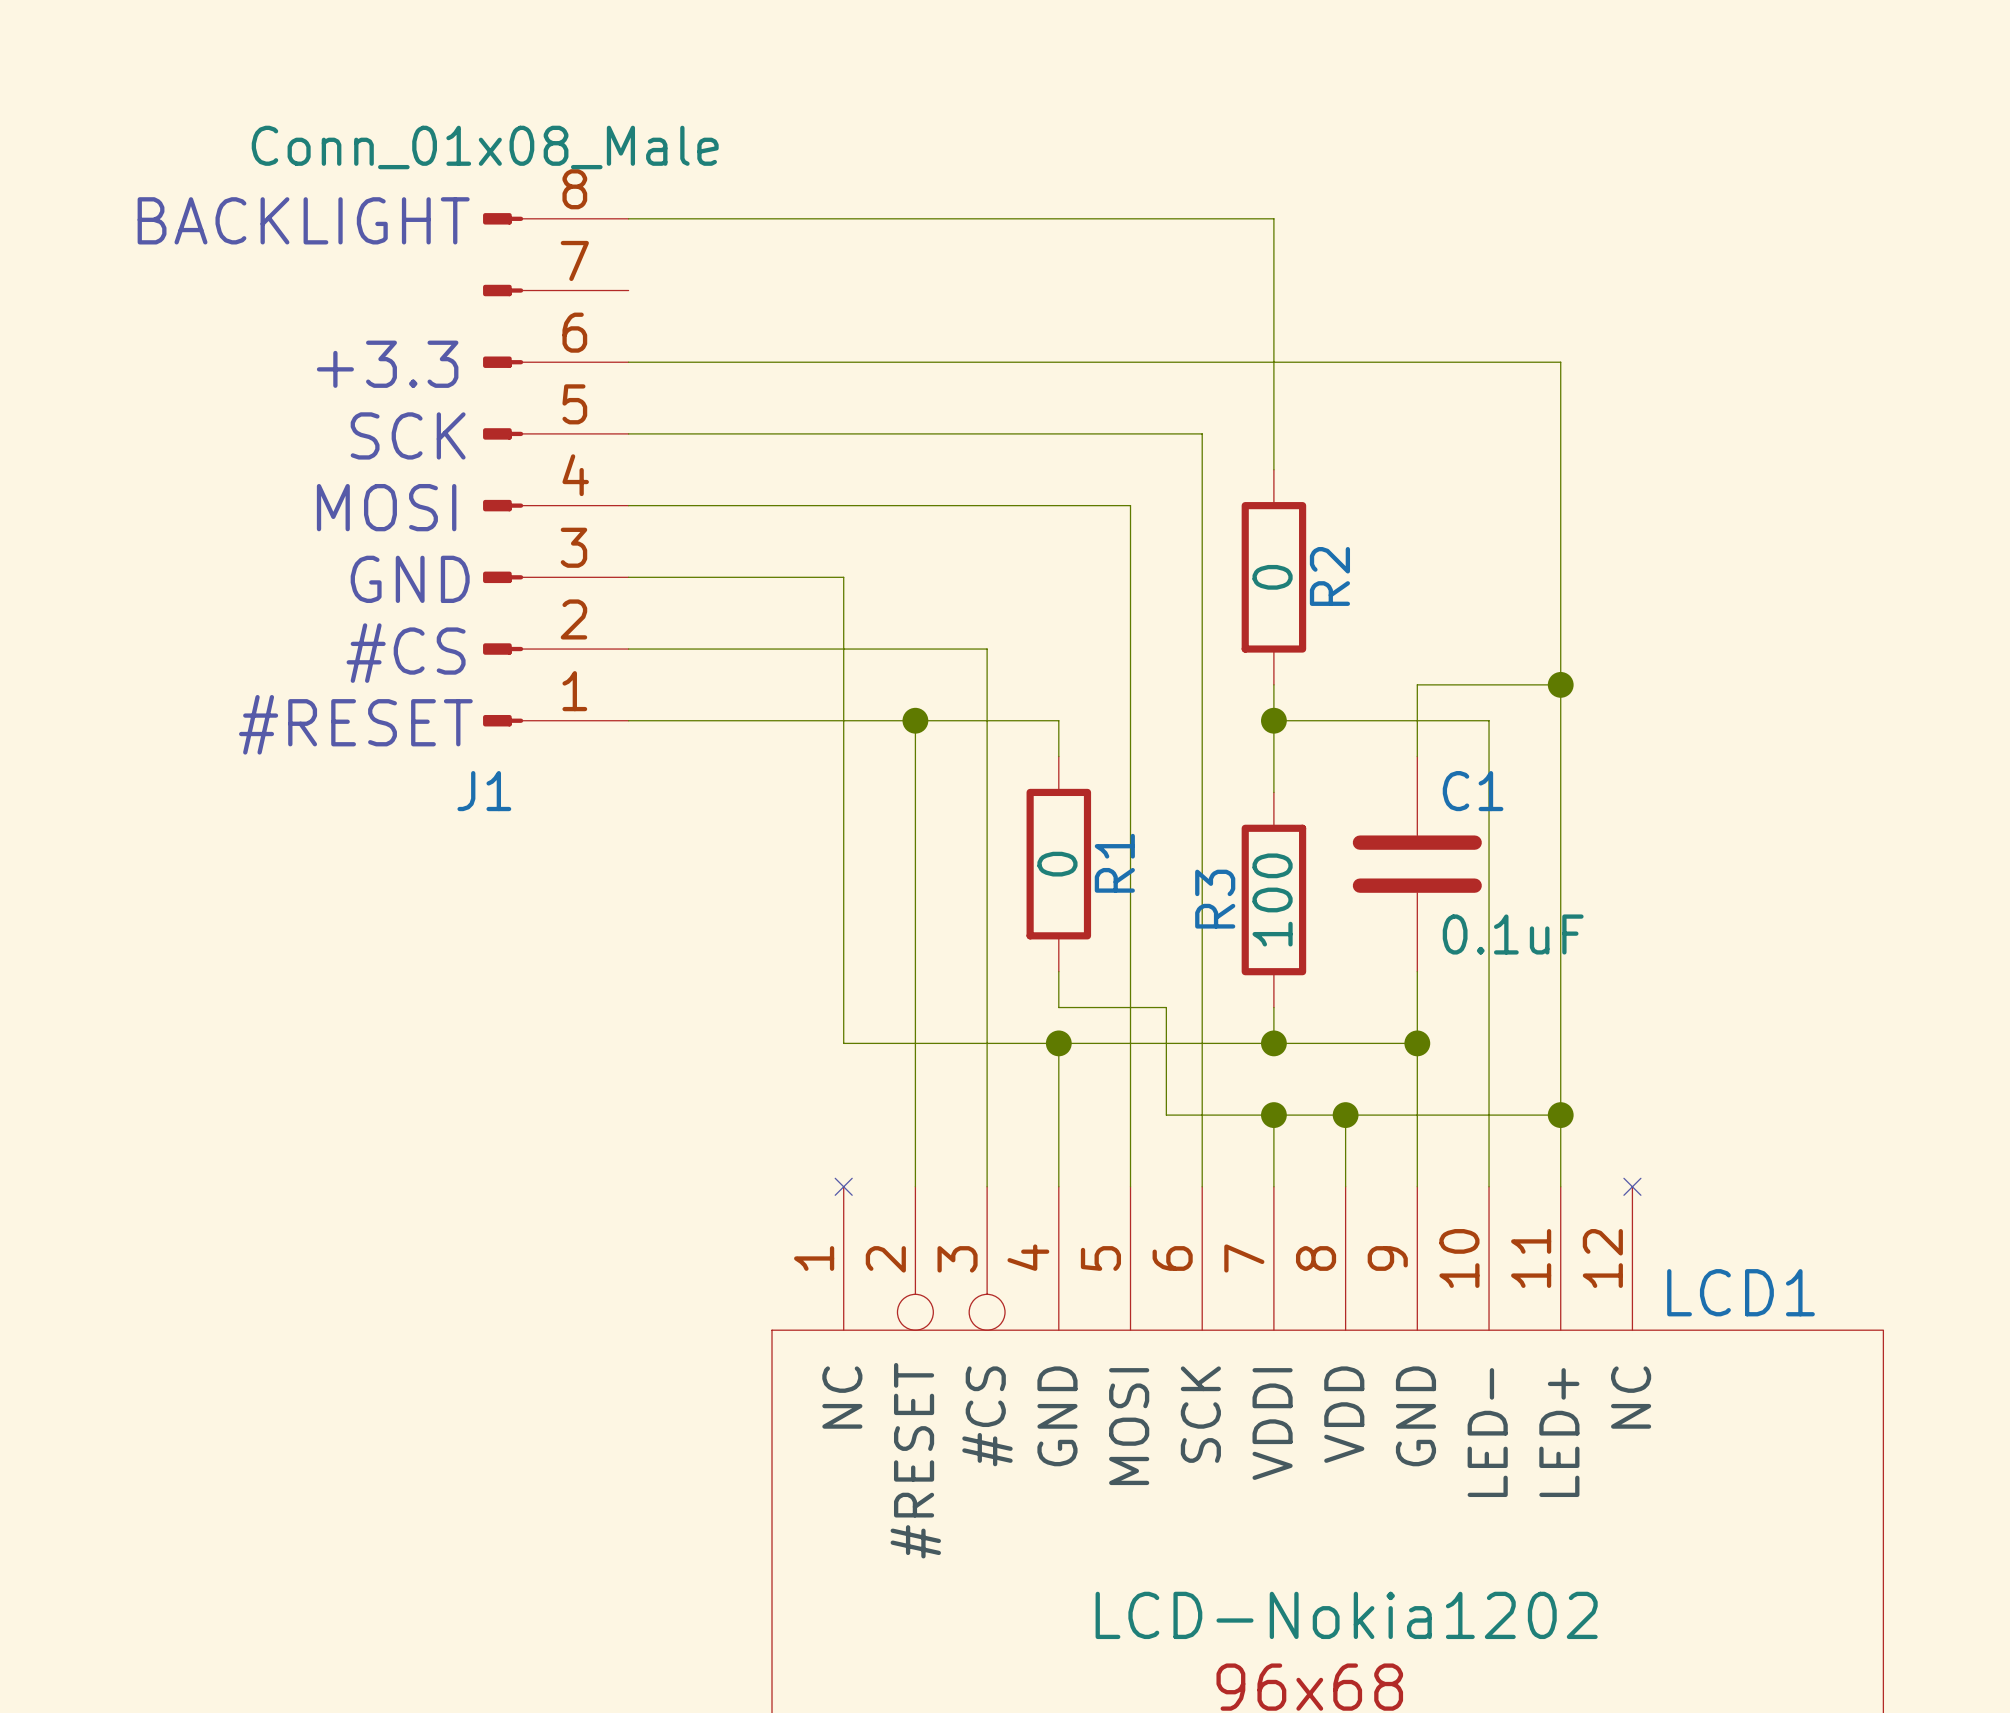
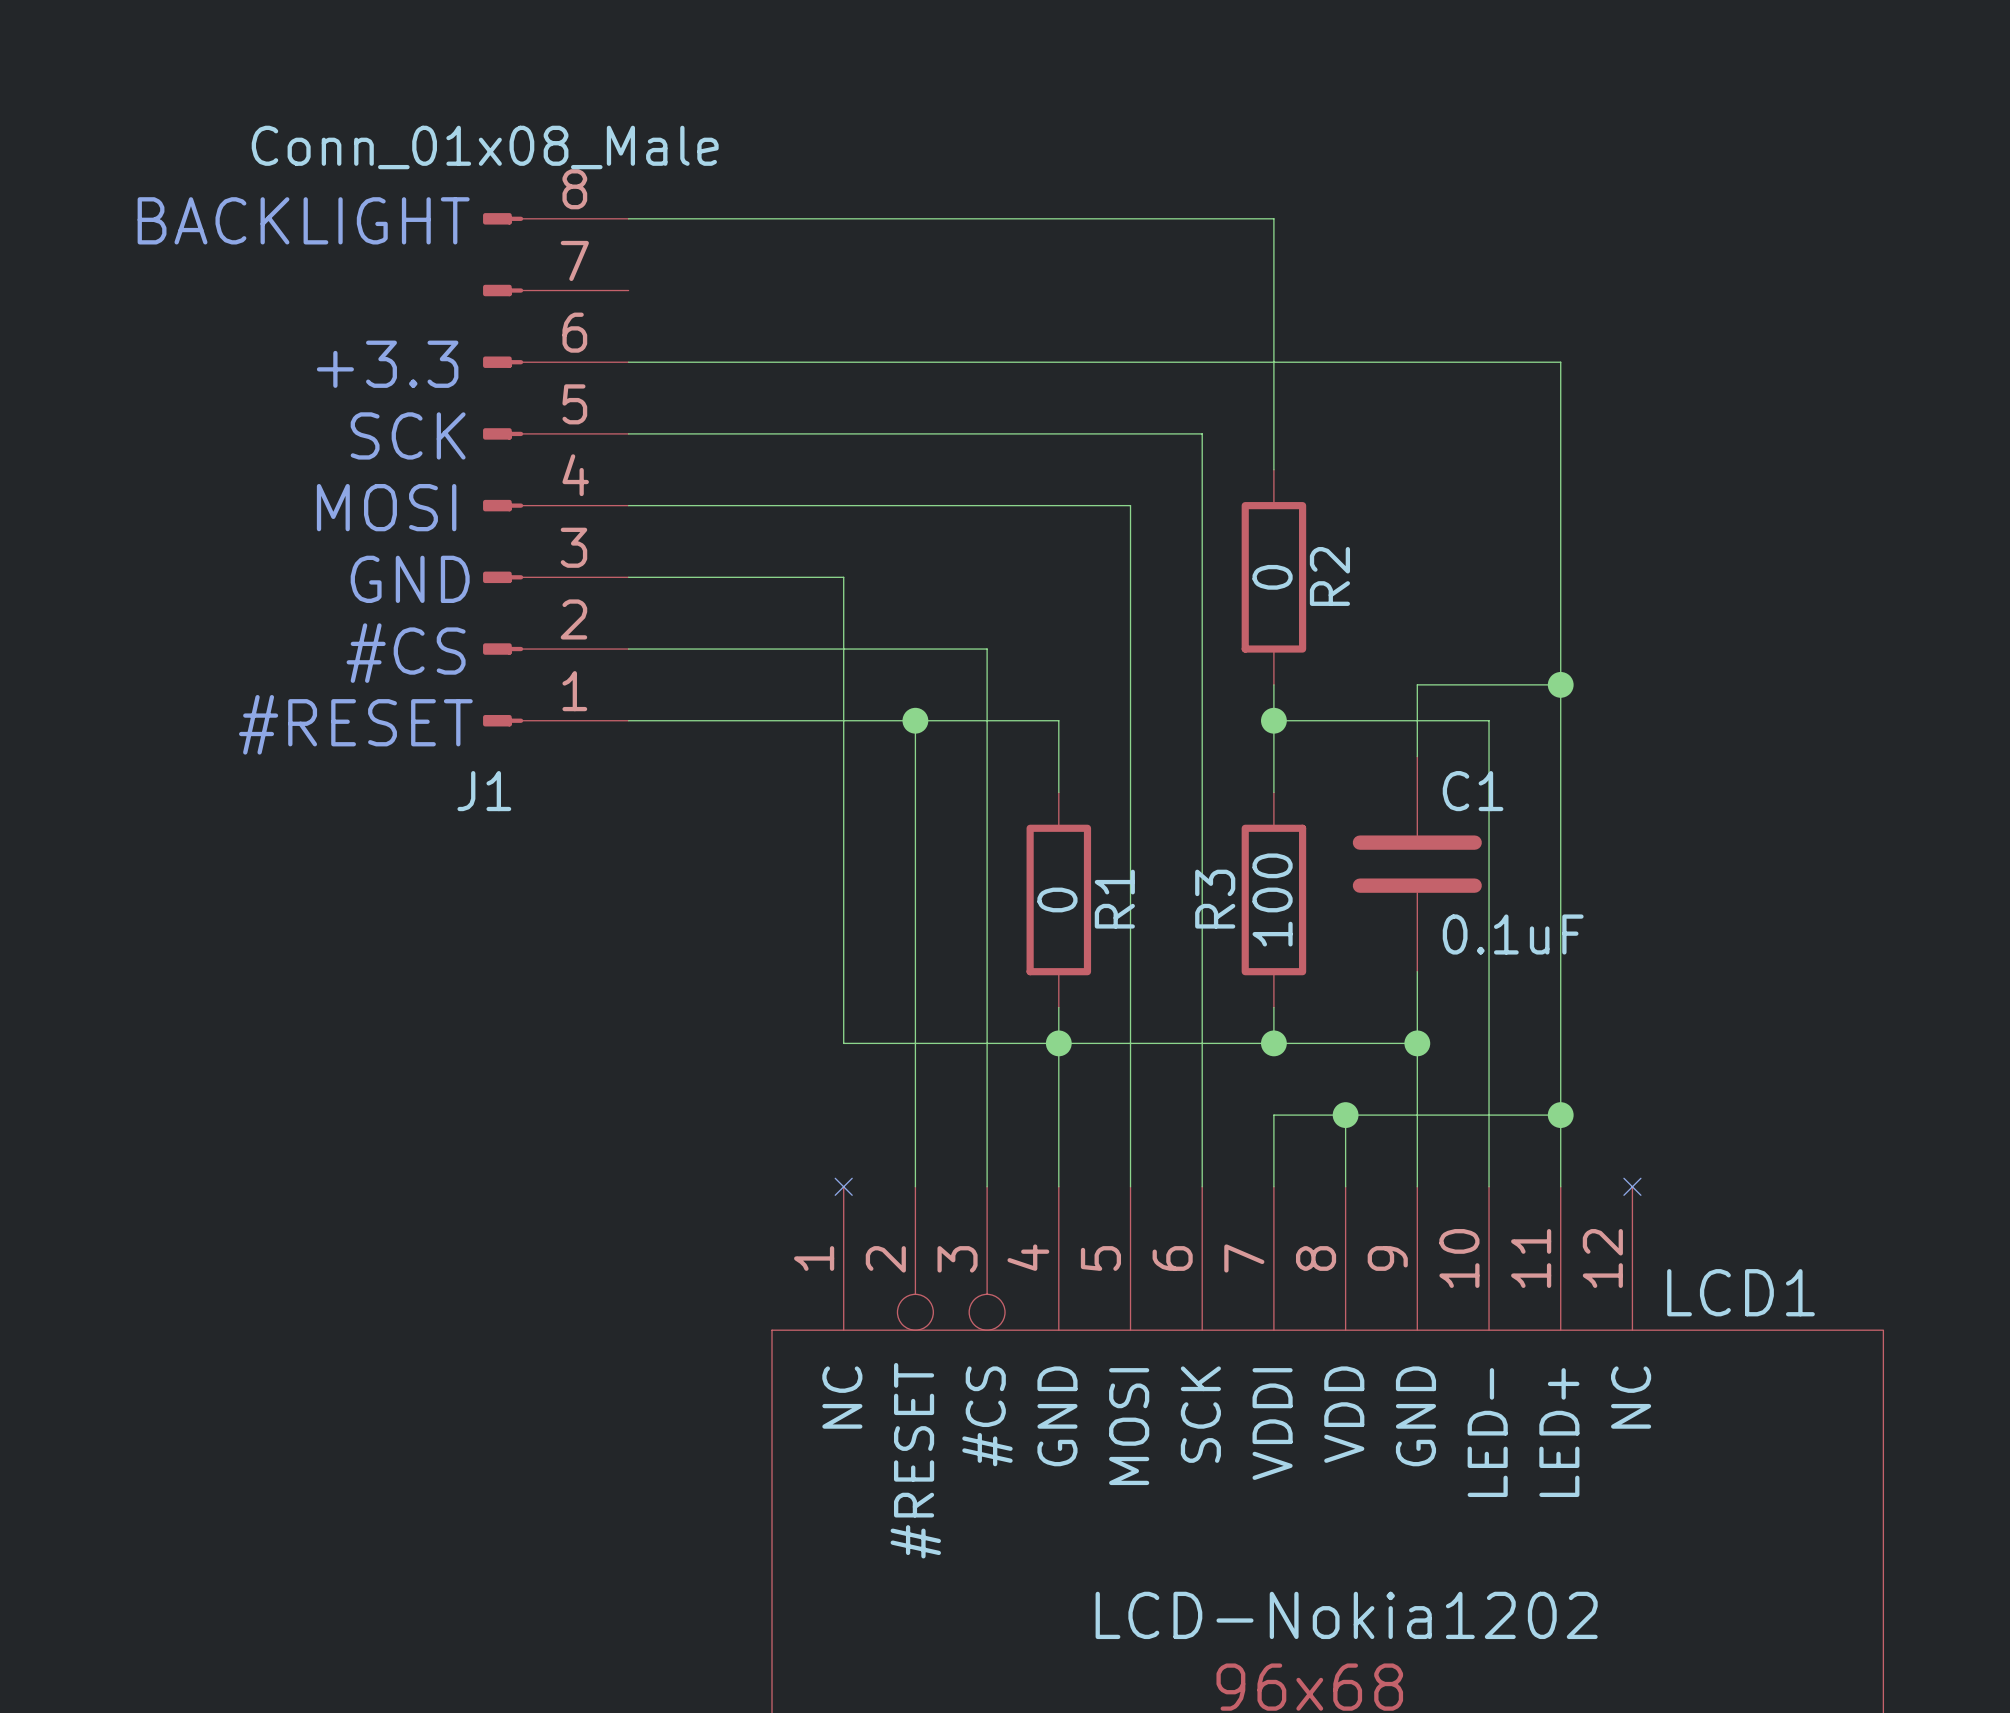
R1 position: (1058, 864) -> (1058, 899)
wire: (1058, 971) (1058, 1007) (1166, 1007) (1166, 1115) (1273, 1115) -> none
wire: none -> (1058, 1007) (1058, 1043)
junction: (1273, 1115) -> none

